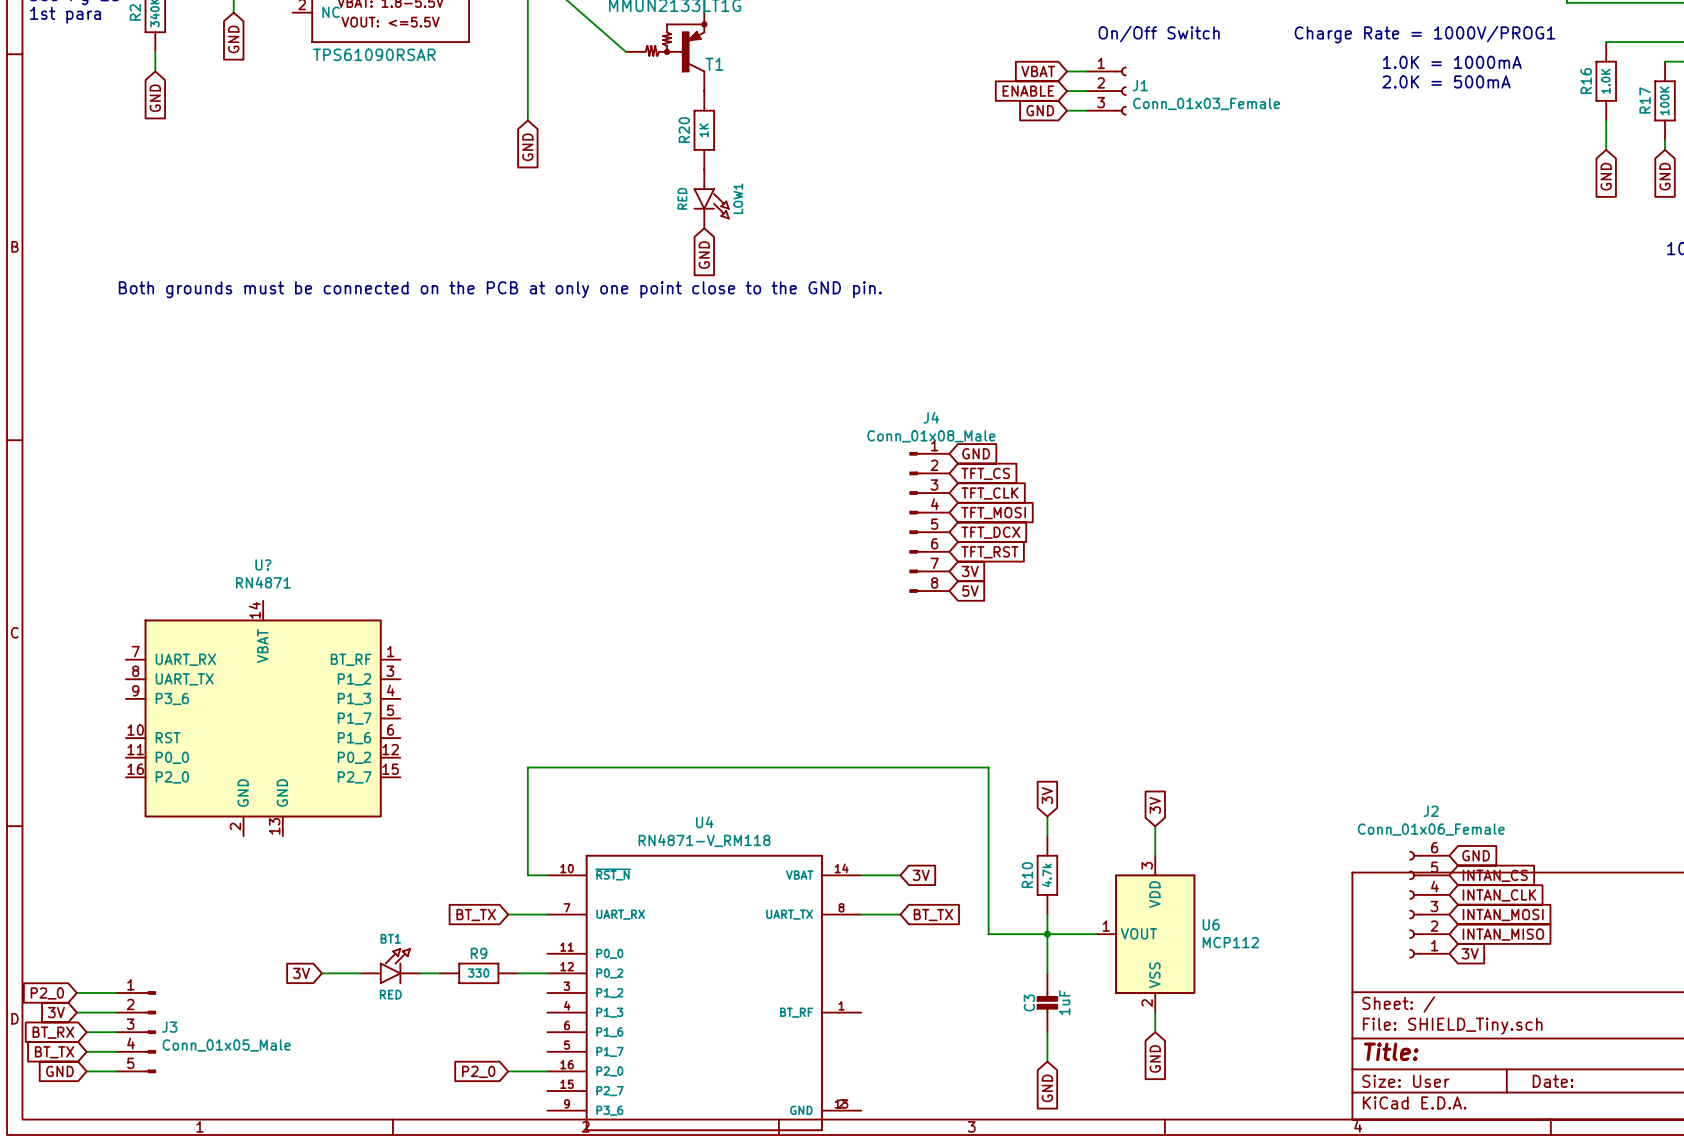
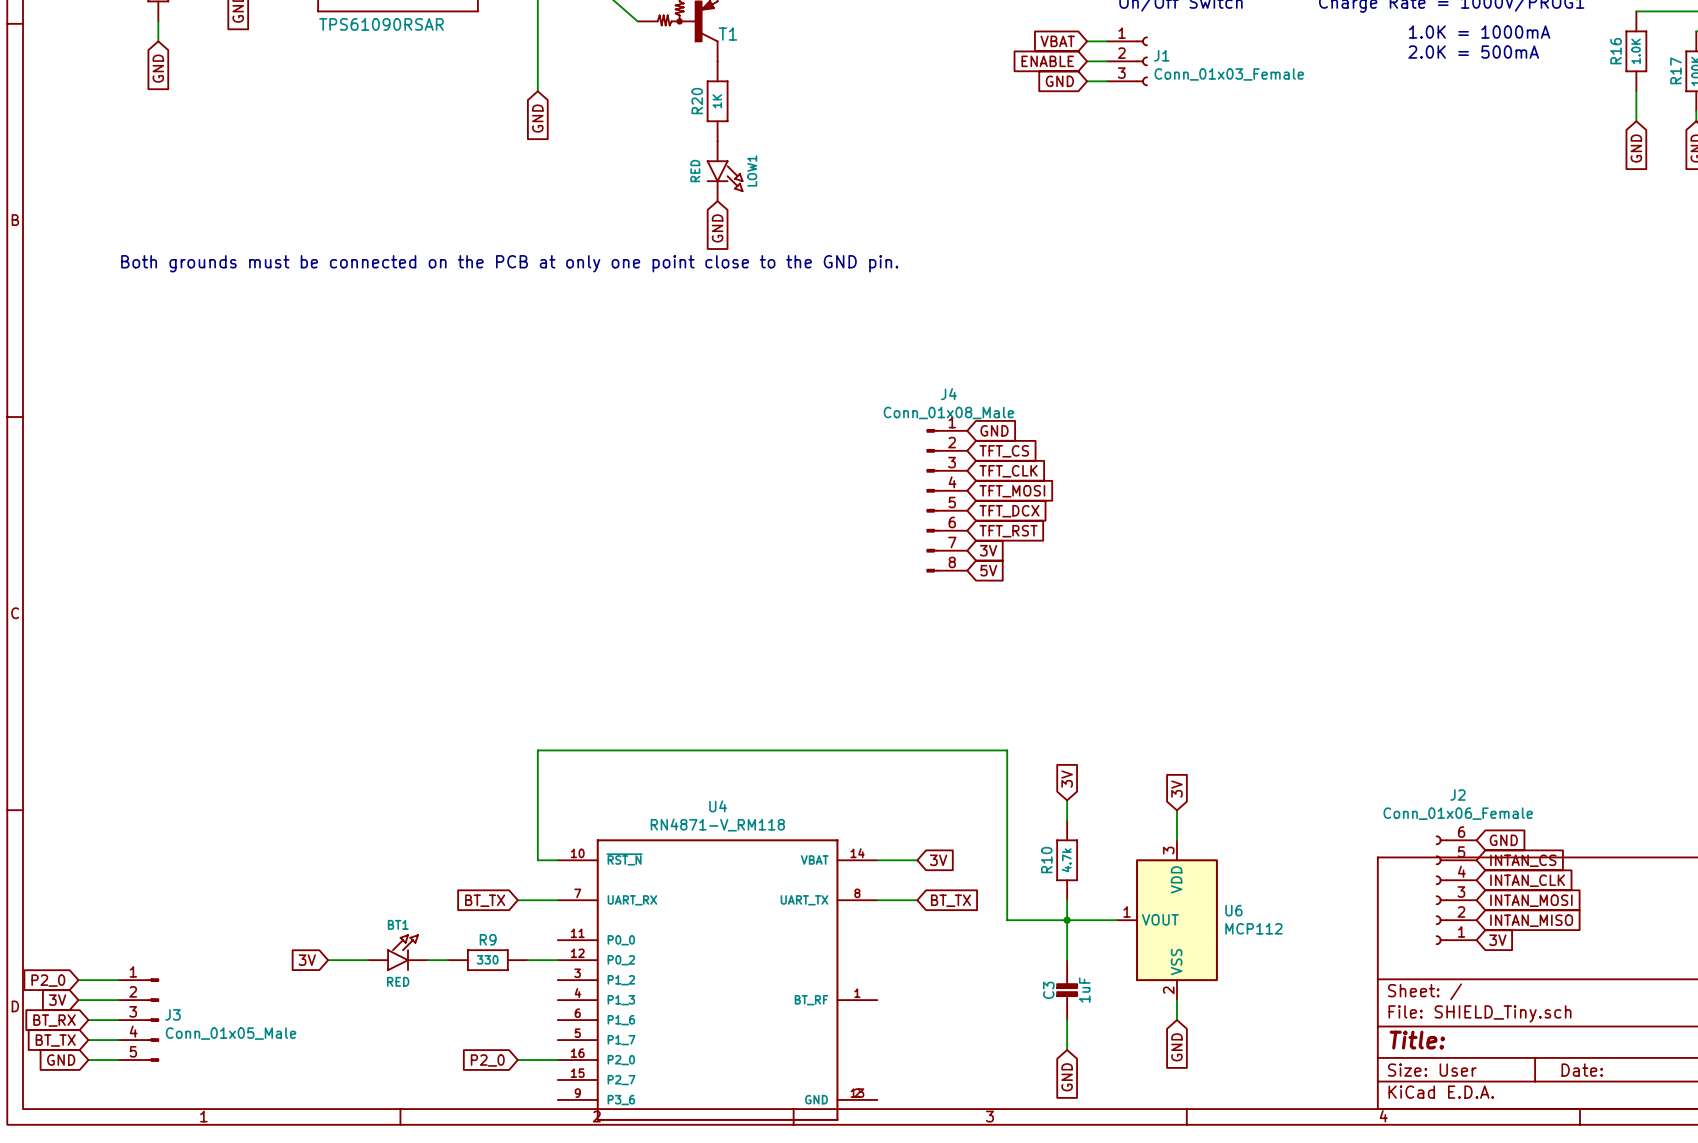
U?: RN4871 (263, 718) -> none

